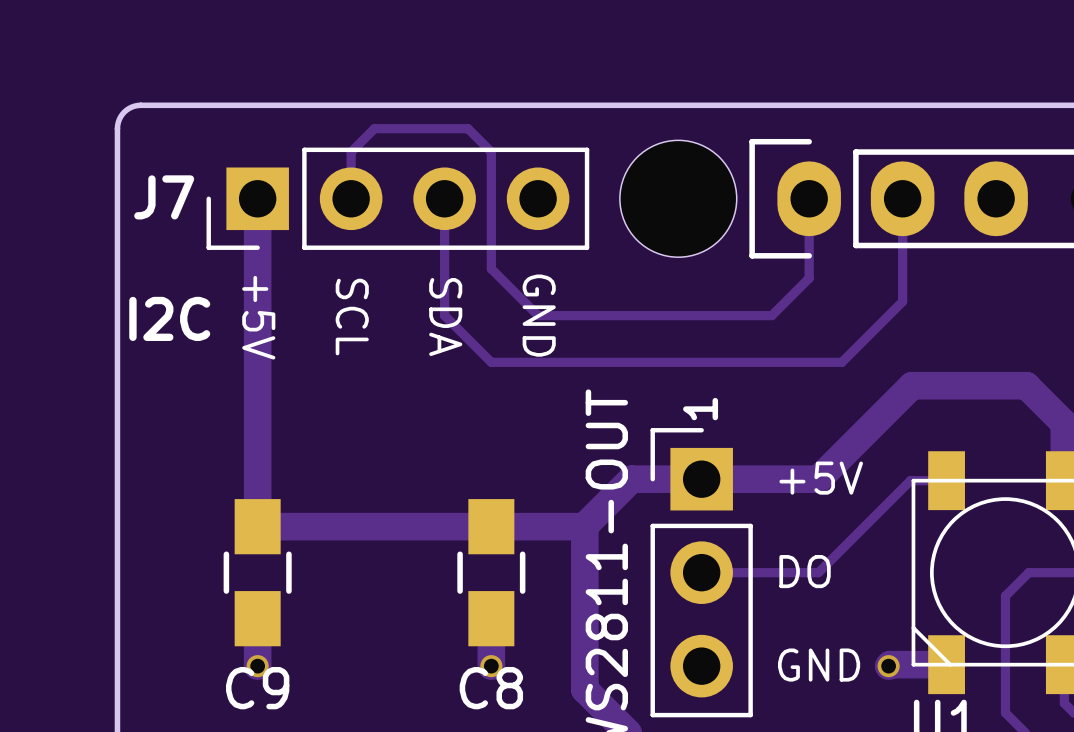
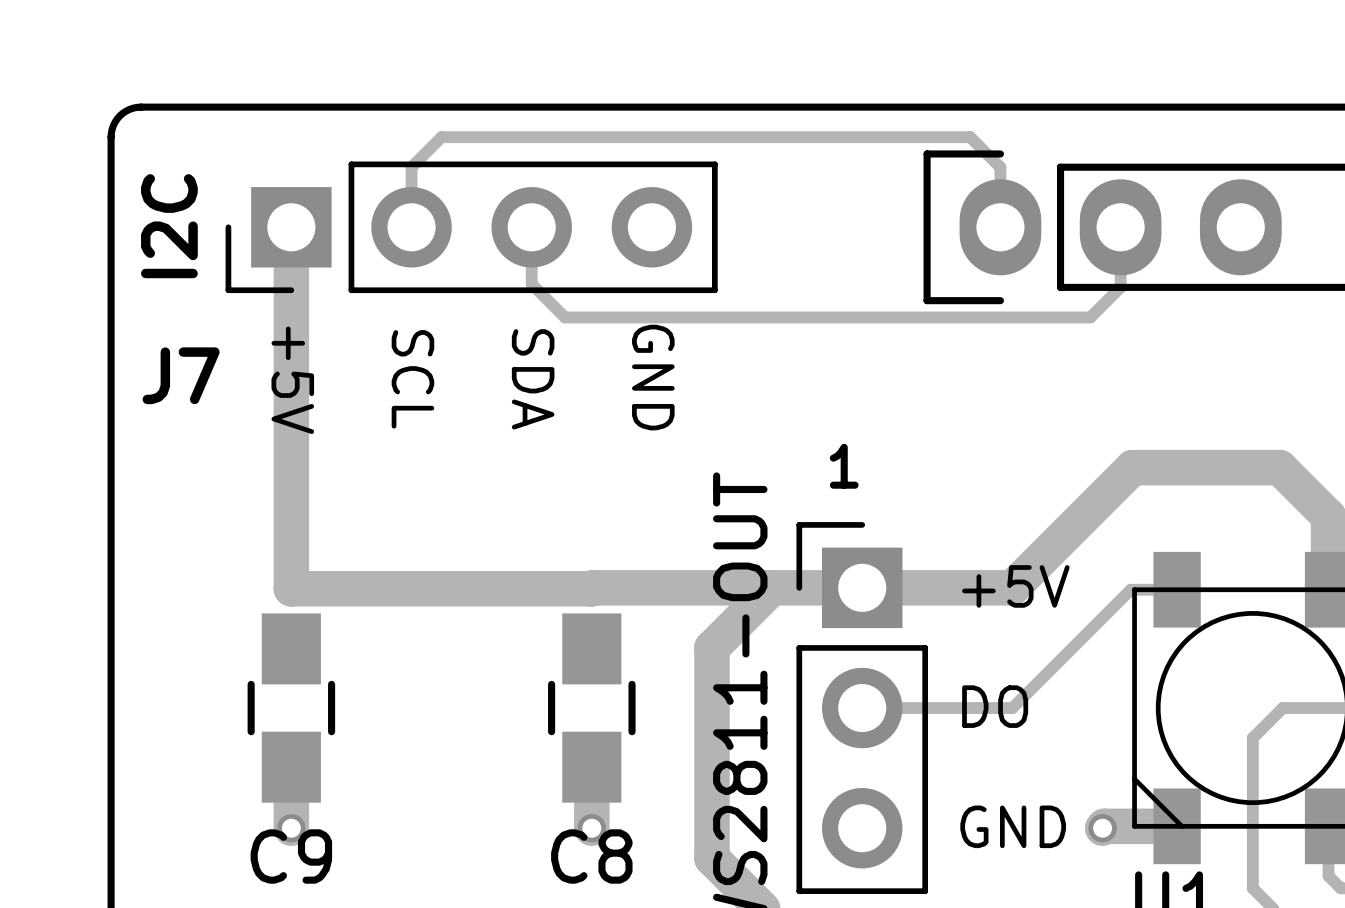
track: (467, 128) (491, 152) (491, 268) (538, 315) (771, 315) (809, 278) (809, 198) -> (561, 137) (970, 137) (1000, 167) (1000, 227)
J7 name position: J7 (164, 197) -> J7 (181, 375)
part: (678, 198) -> none
track: (444, 243) (444, 315) (491, 362) (841, 362) (902, 301) (902, 245) -> (531, 284) (564, 317) (1090, 317) (1120, 287)
J7 value rotation: 0° (169, 318) -> 90° counterclockwise (169, 226)
text rotation: 0° (700, 409) -> 90° clockwise (844, 466)
track: (257, 479) (257, 526) (584, 526) -> (291, 588) (772, 587)

